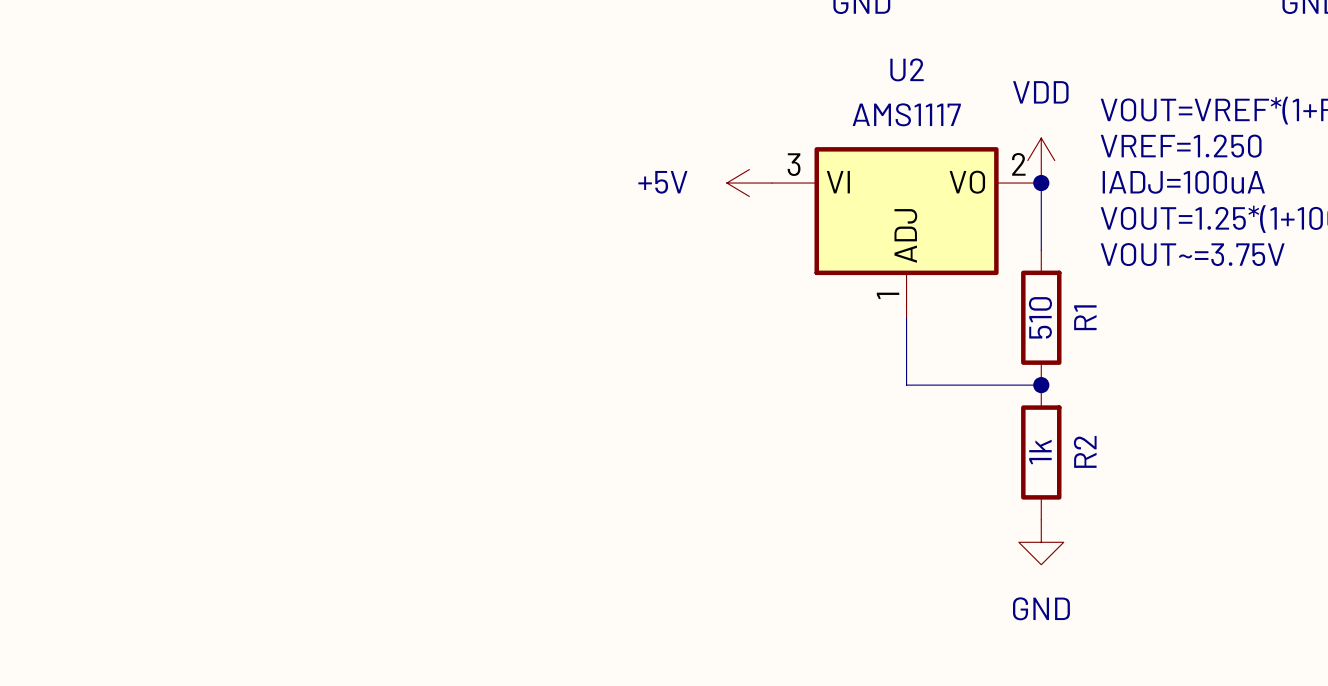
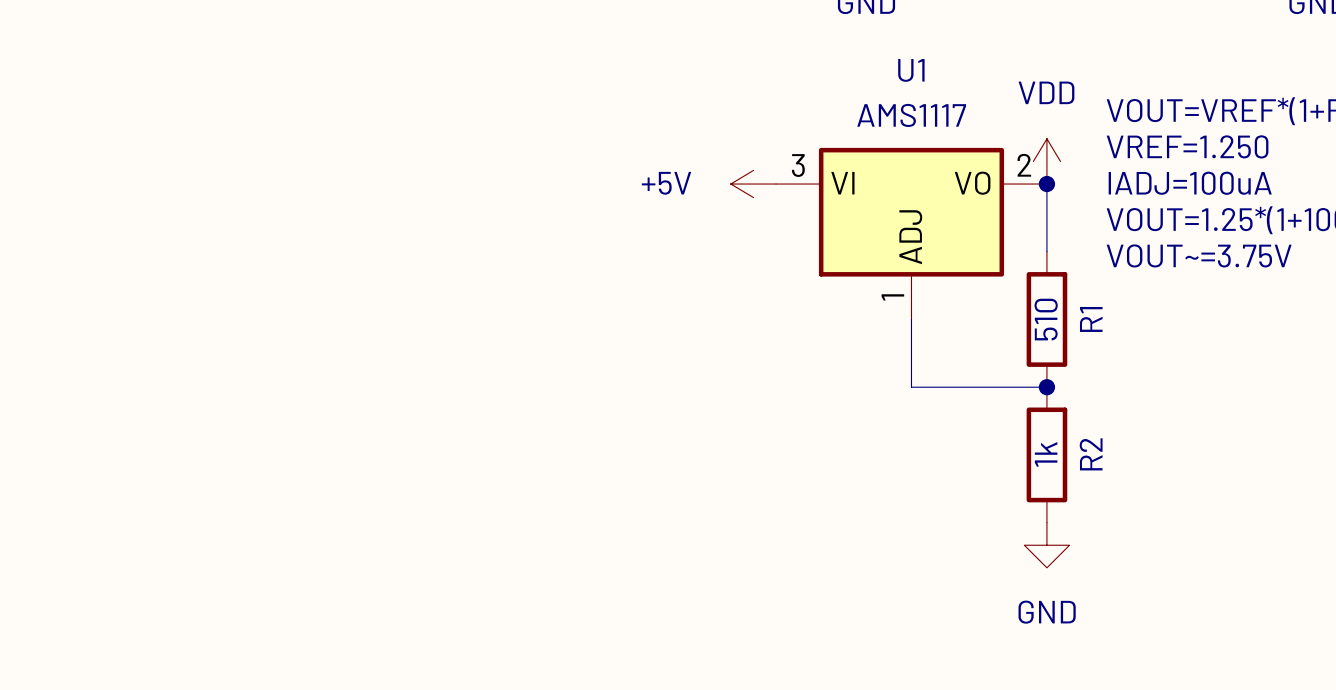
U2 name: U2 (907, 69) -> U1 (911, 70)

